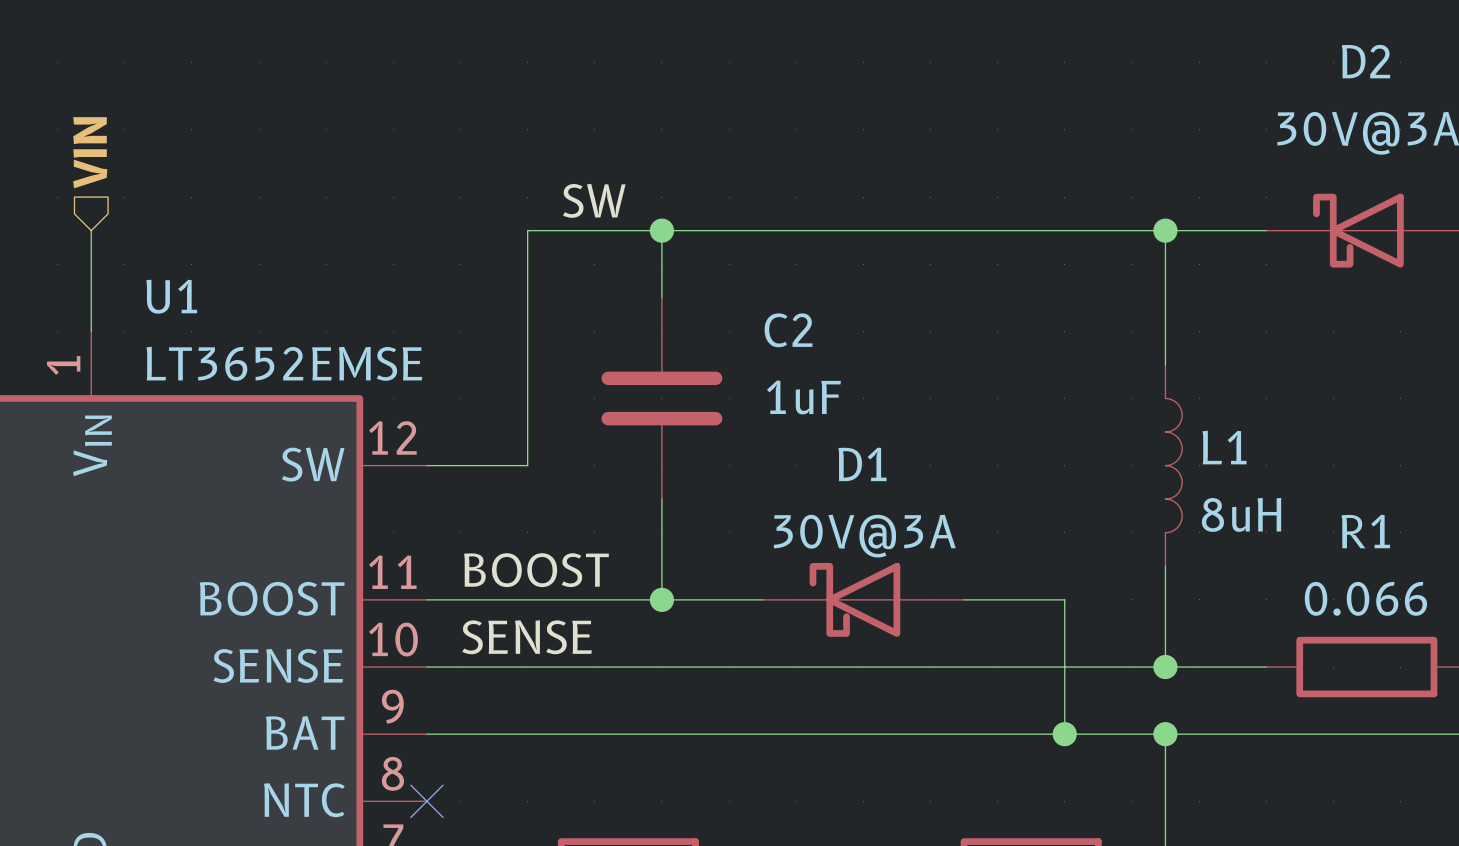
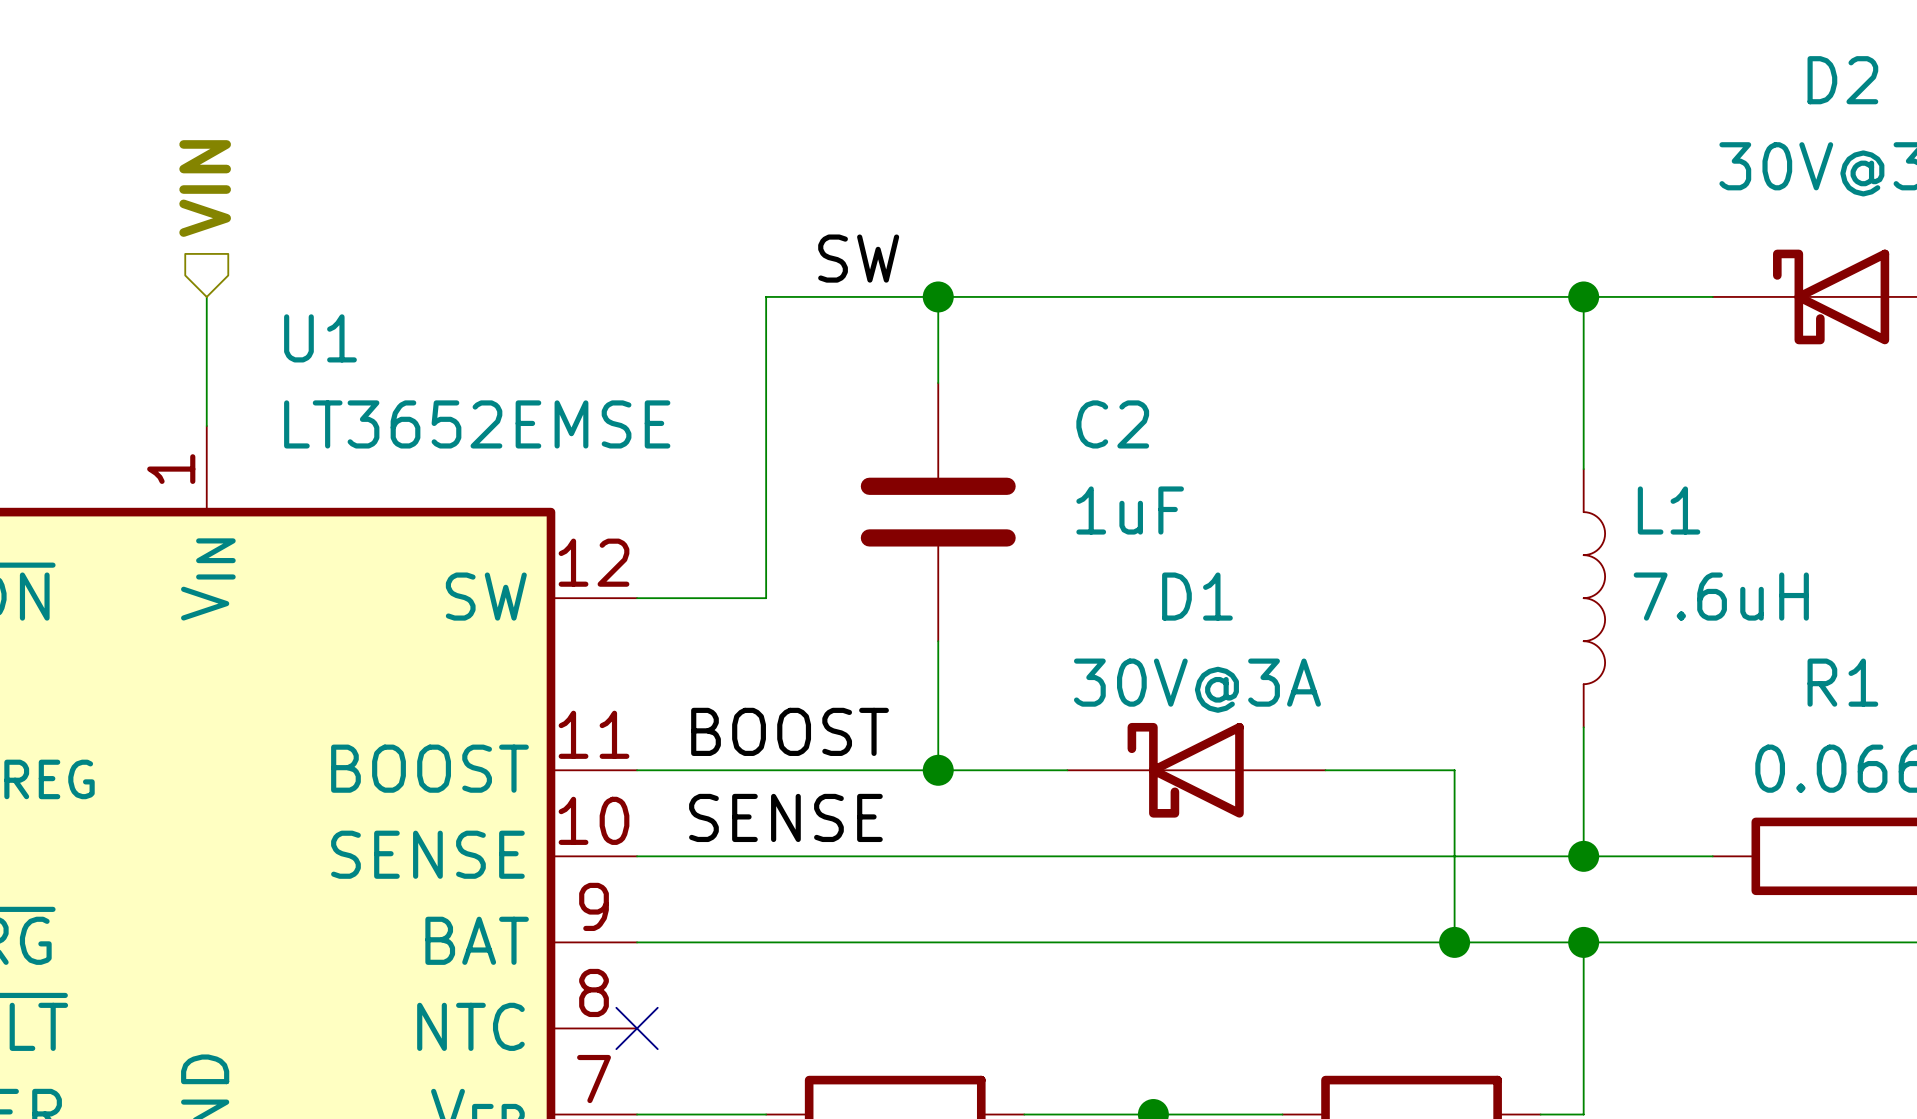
U1 name position: U1 (171, 296) -> U1 (320, 338)
U1 value position: LT3652EMSE (284, 363) -> LT3652EMSE (477, 424)
L1 name position: L1 (1224, 447) -> L1 (1669, 510)
L1 value: 8uH (1241, 514) -> 7.6uH (1721, 596)

